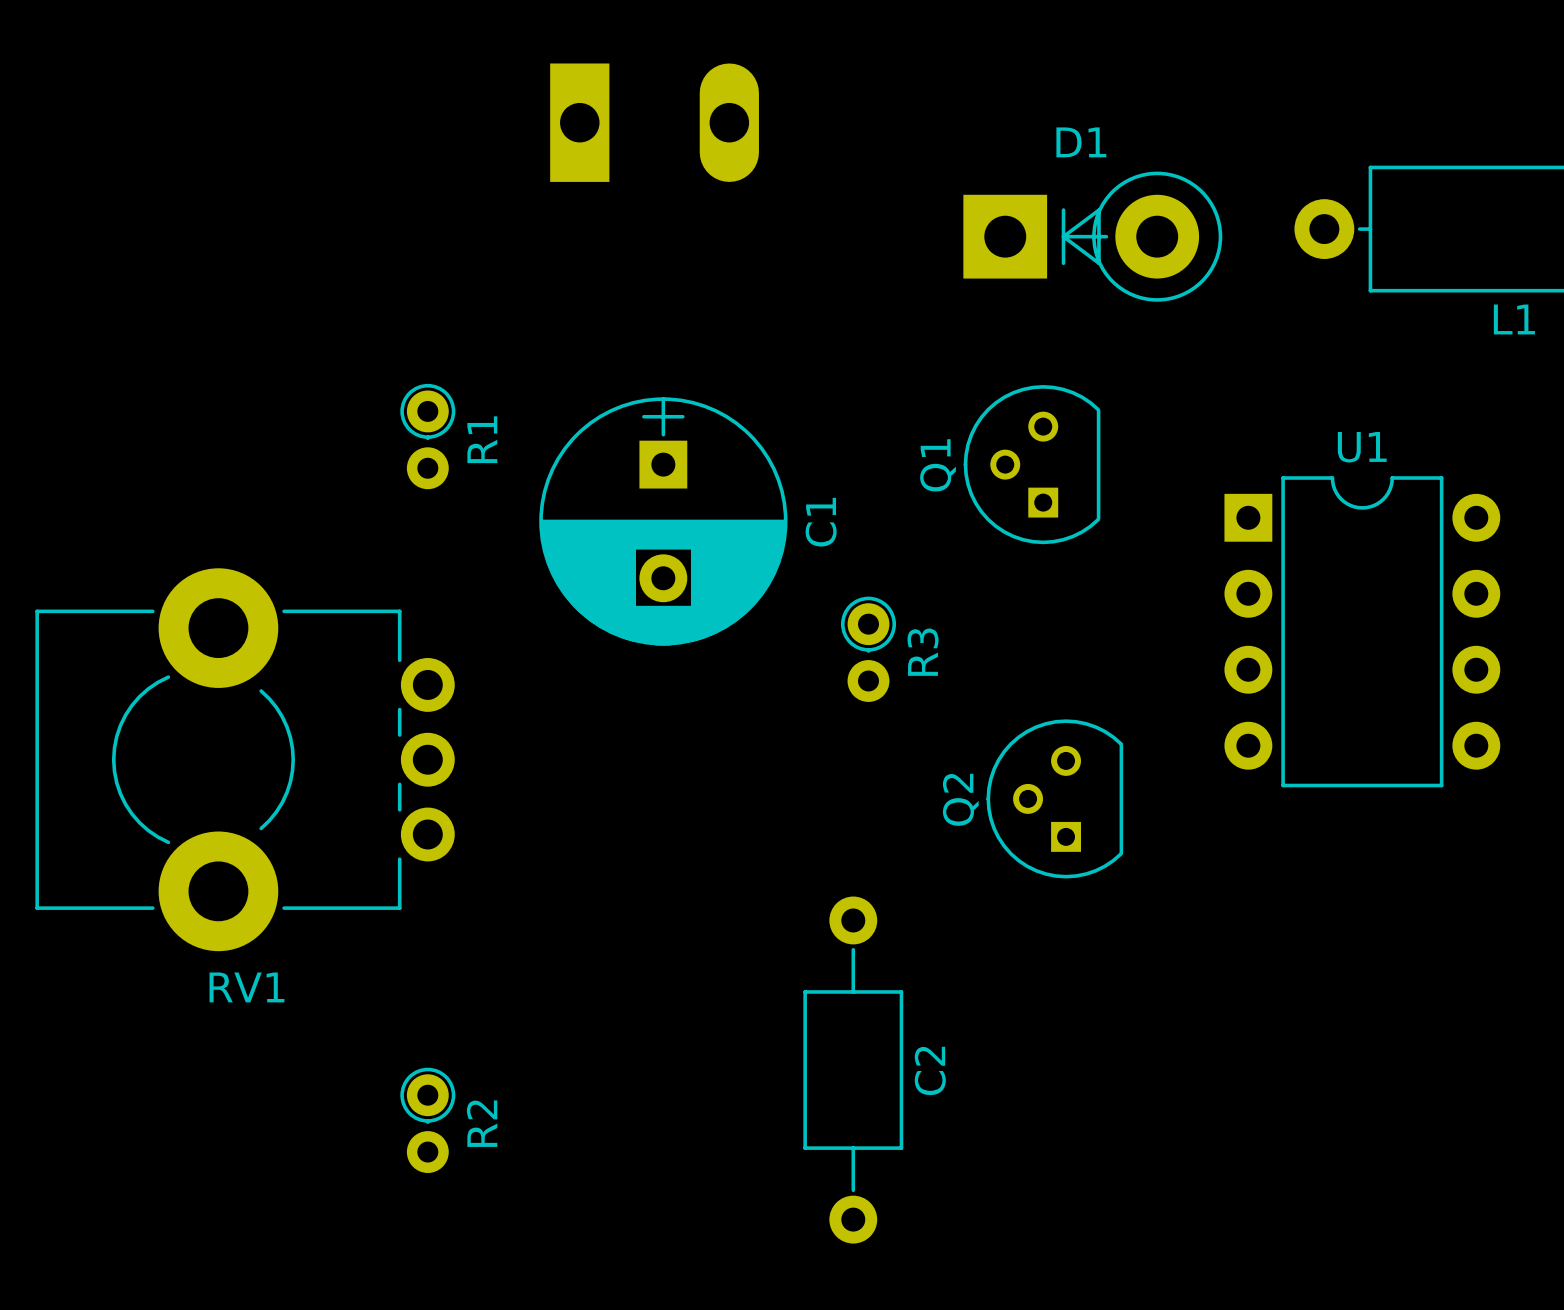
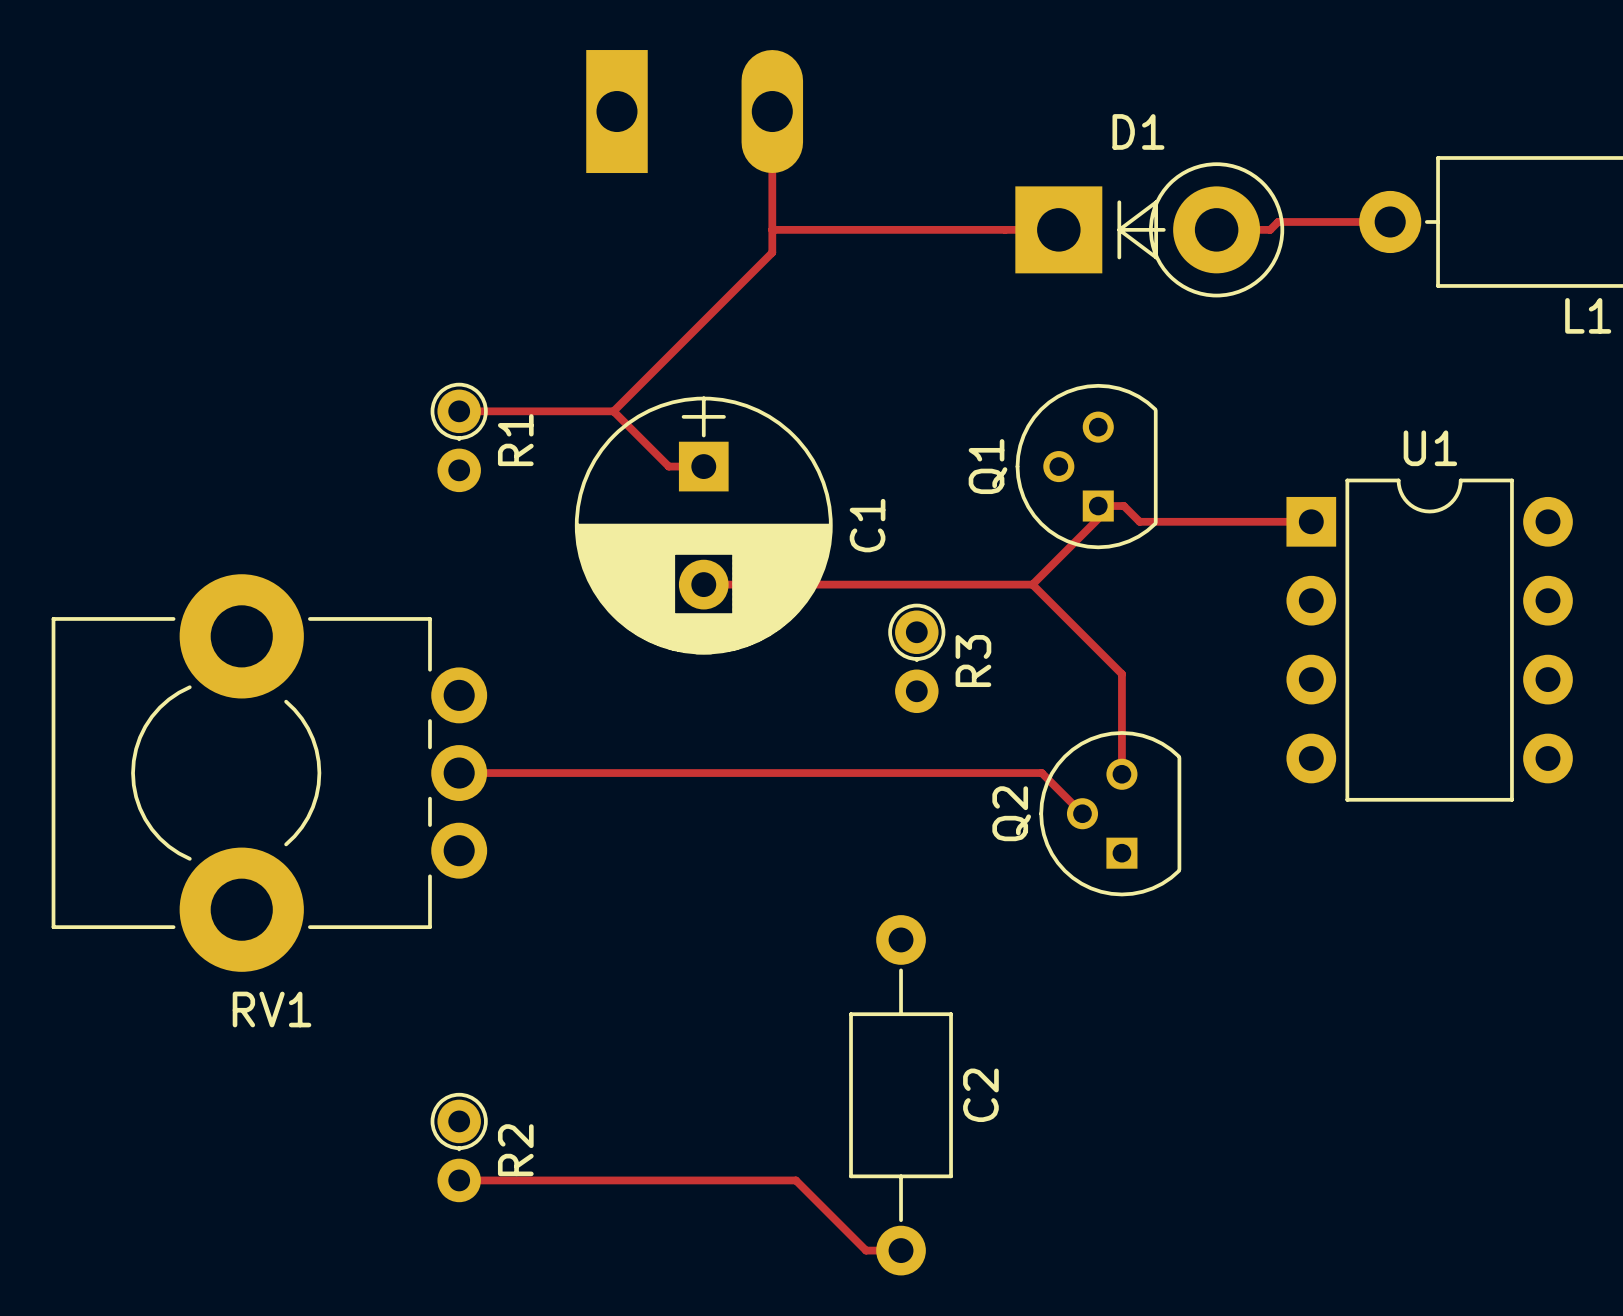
track: none -> (772, 111) (772, 252) (613, 411)
track: none -> (1390, 221) (1278, 221) (1270, 229) (1216, 229)
track: none -> (772, 229) (1058, 229)
track: none -> (459, 411) (613, 411)
track: none -> (613, 411) (668, 466) (703, 466)
track: none -> (1098, 506) (1123, 506) (1139, 521) (1311, 521)
track: none -> (1111, 506) (1032, 584)
track: none -> (703, 584) (1032, 584)
track: none -> (1032, 584) (1121, 674) (1121, 774)
track: none -> (459, 773) (1041, 773) (1082, 813)
track: none -> (459, 1180) (795, 1180) (866, 1250) (901, 1250)

